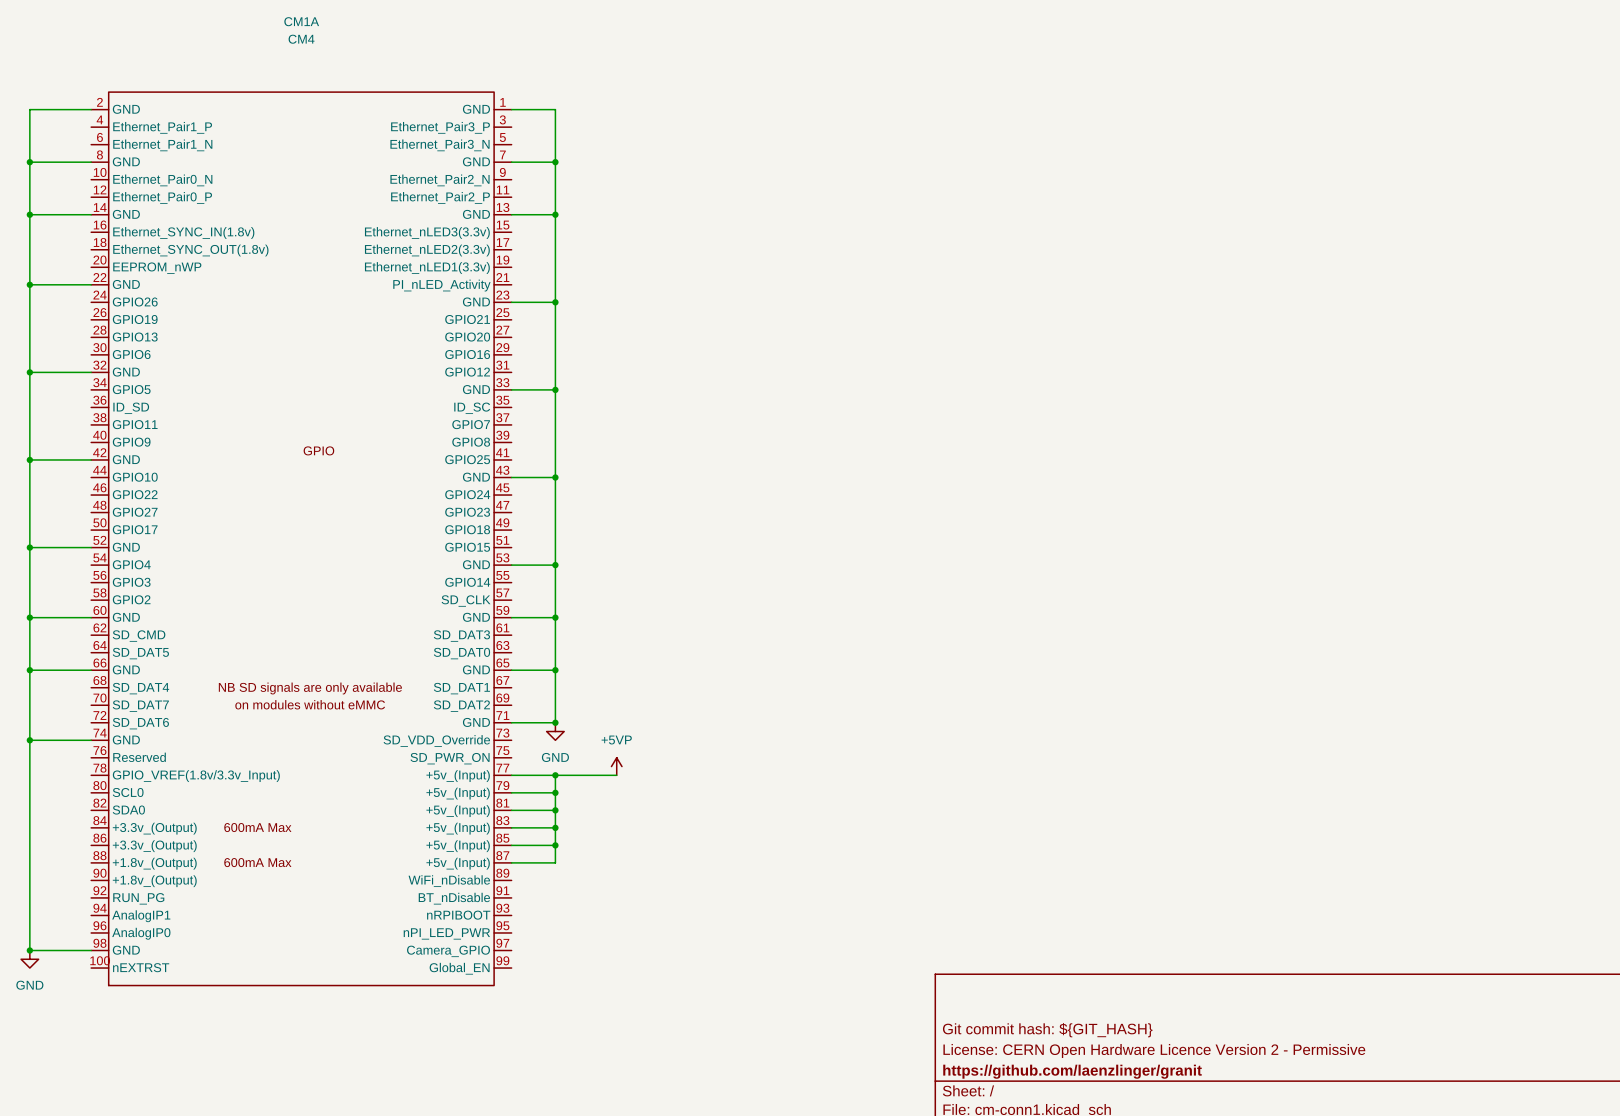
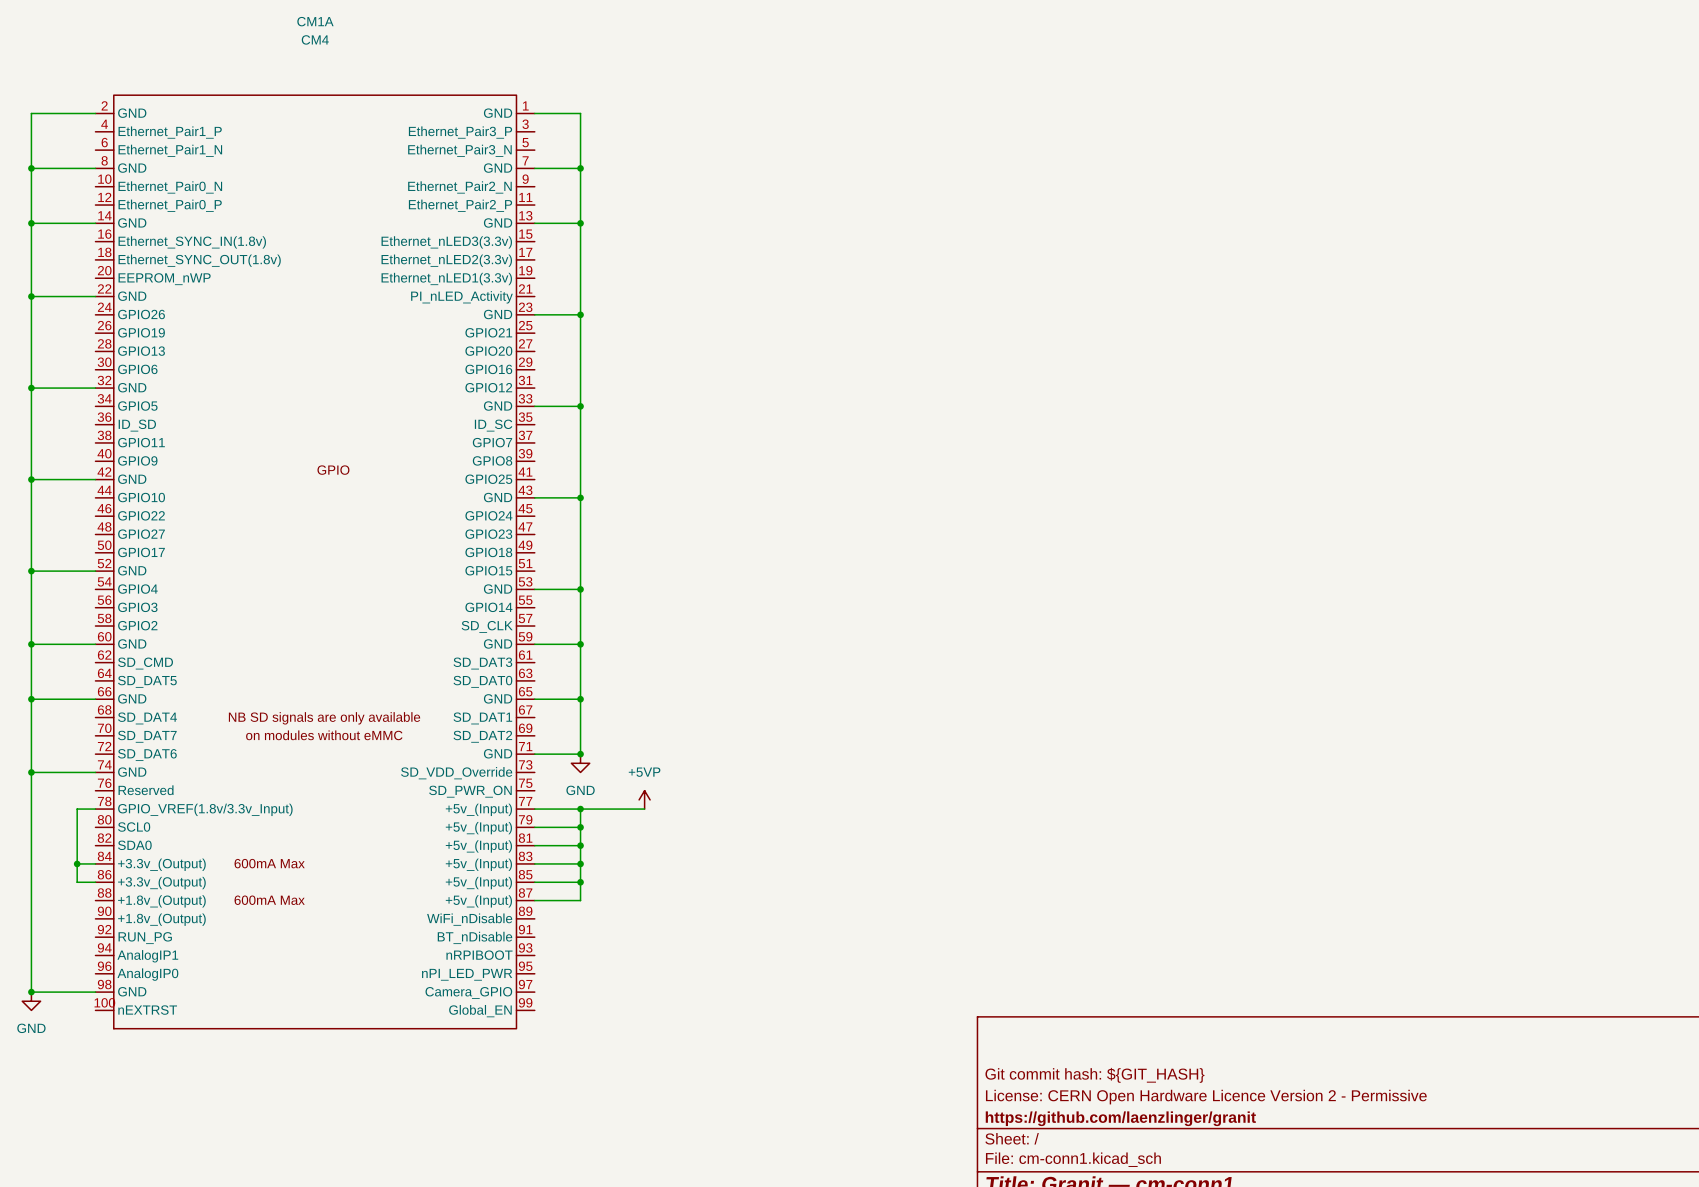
wire: none -> (95, 809) (77, 809) (77, 882) (95, 882)
wire: none -> (77, 863) (95, 863)
junction: none -> (77, 863)

